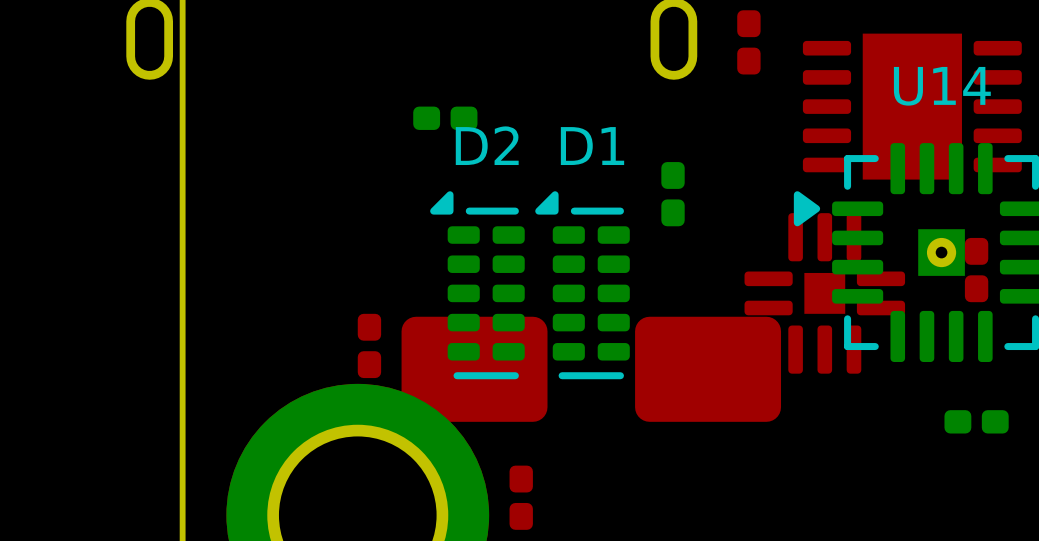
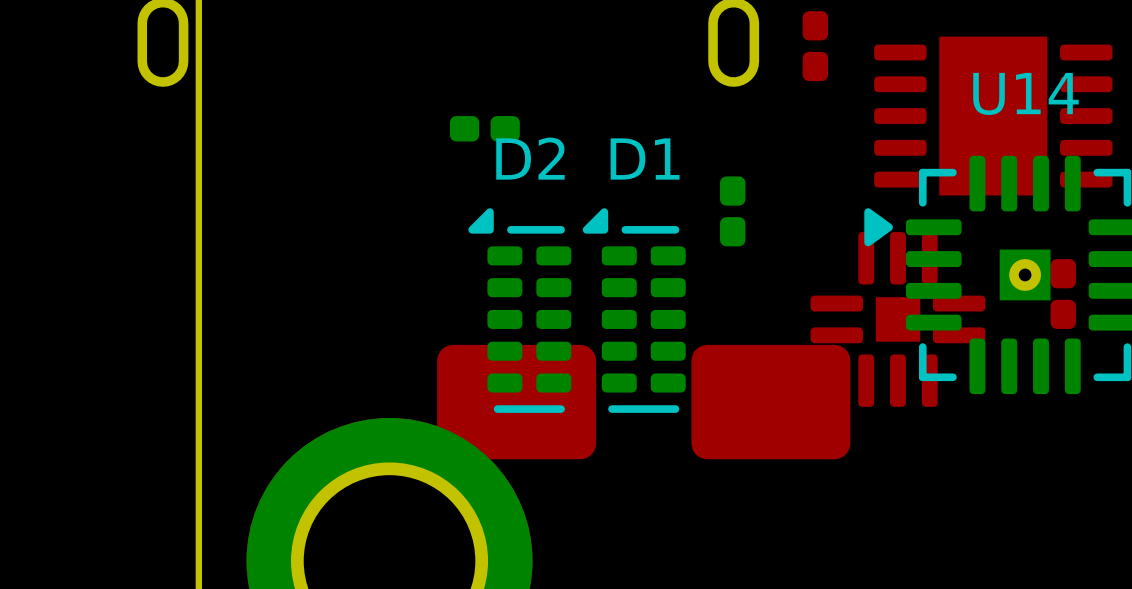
part: (369, 345) -> none
part: (976, 421) -> none
part: (521, 497) -> none

